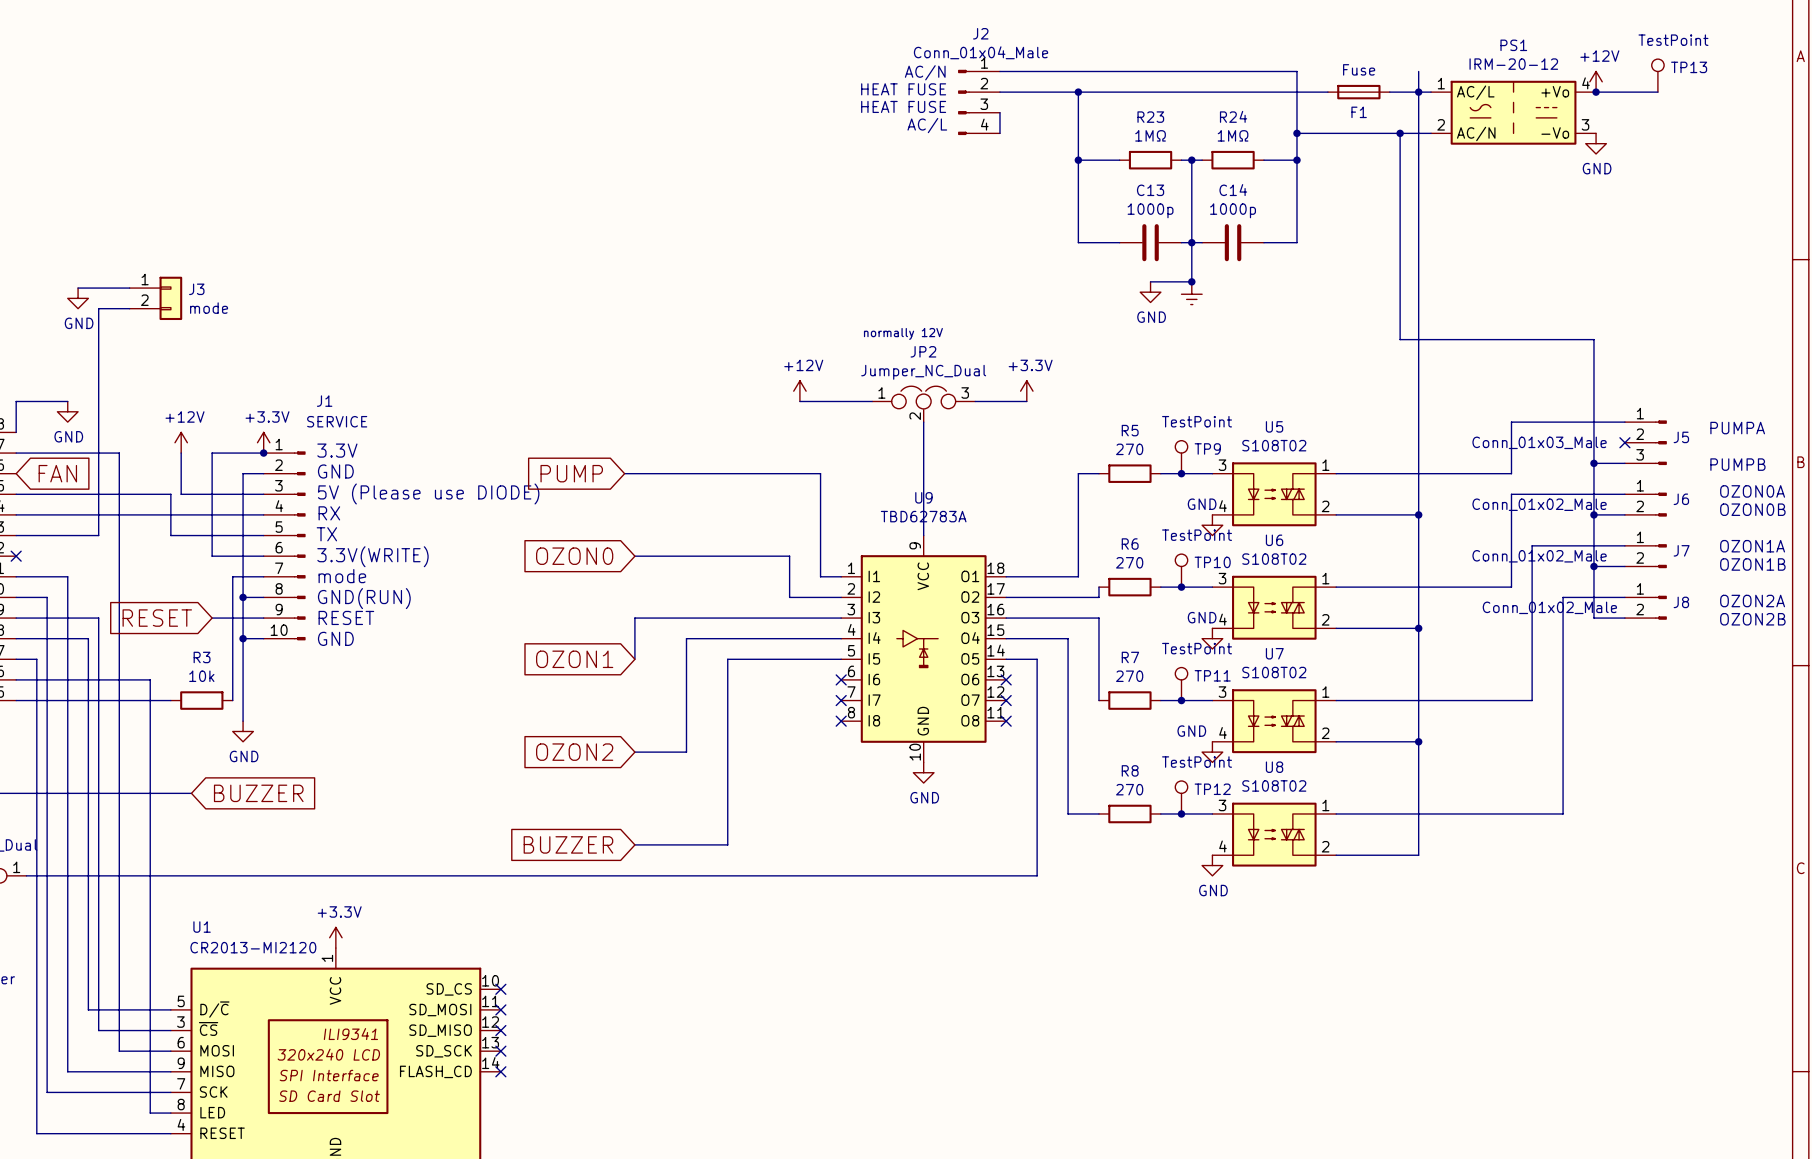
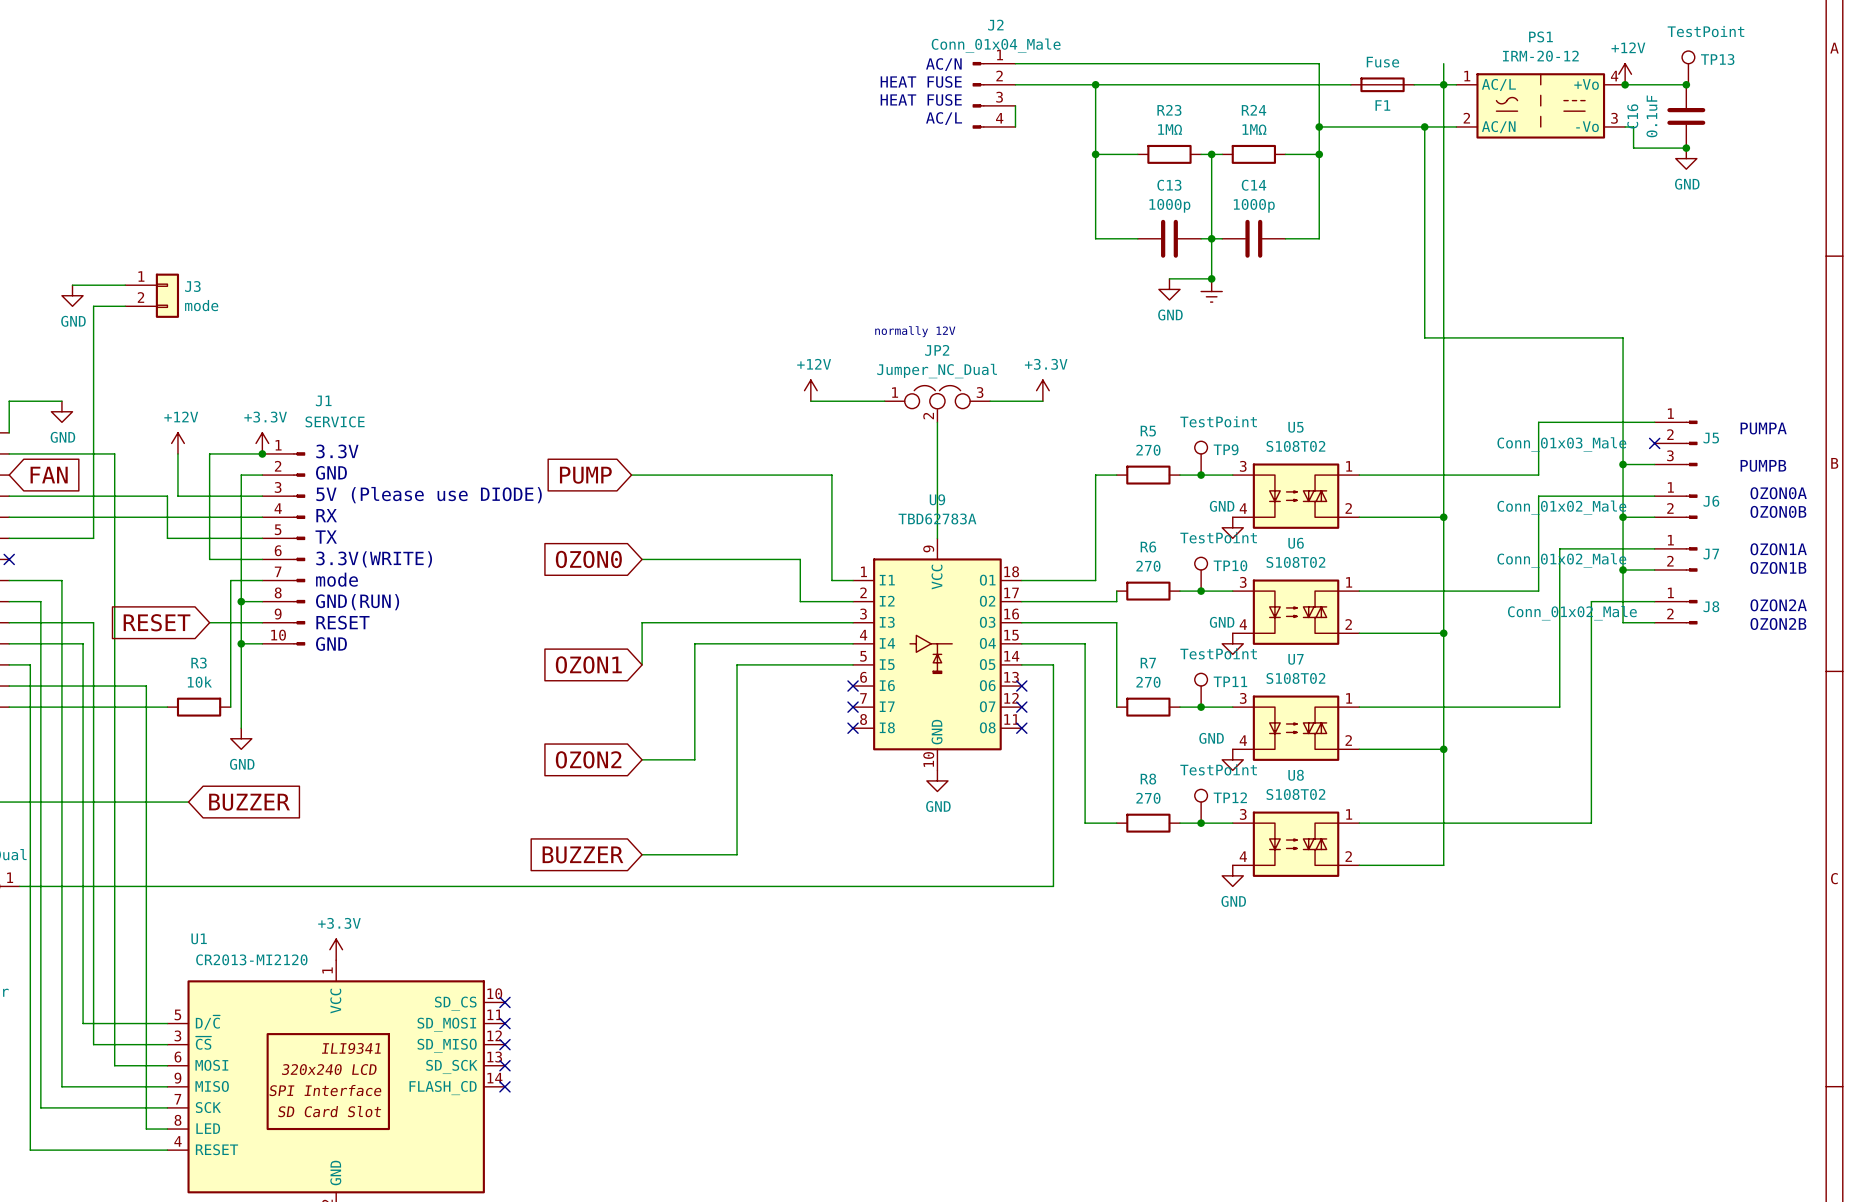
junction: none -> (1686, 84)
C16: none -> 0.1uF (1686, 116)
wire: none -> (1625, 126) (1633, 126) (1633, 148) (1686, 148)
power symbol position: GND (1596, 143) -> GND (1686, 158)
junction: none -> (1686, 148)

